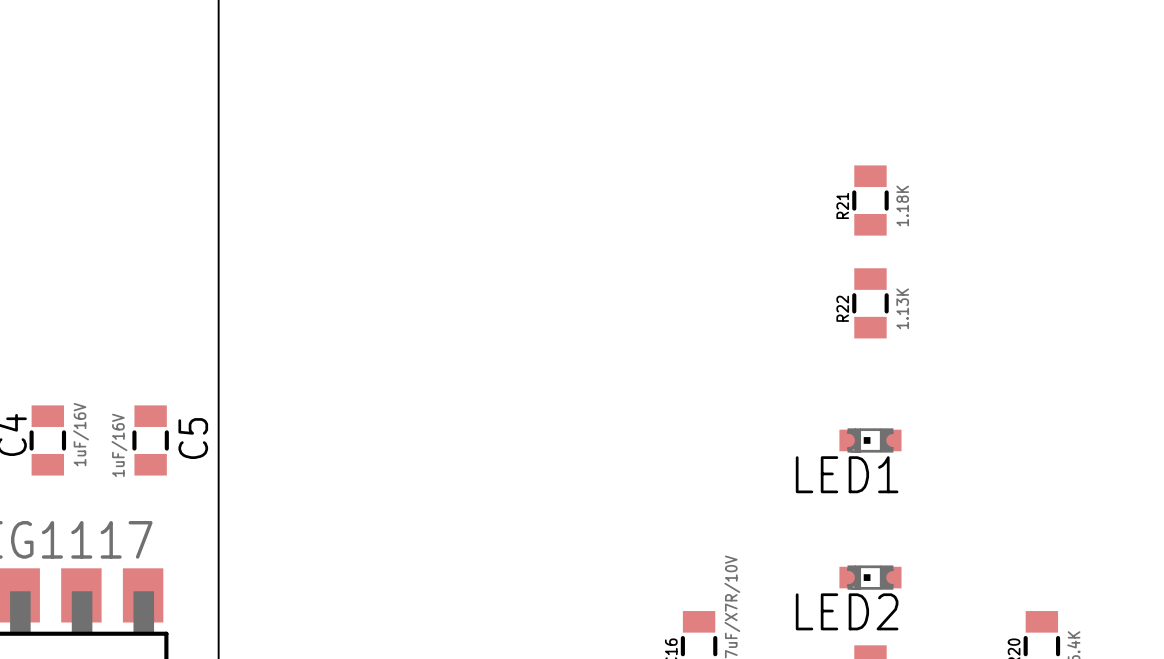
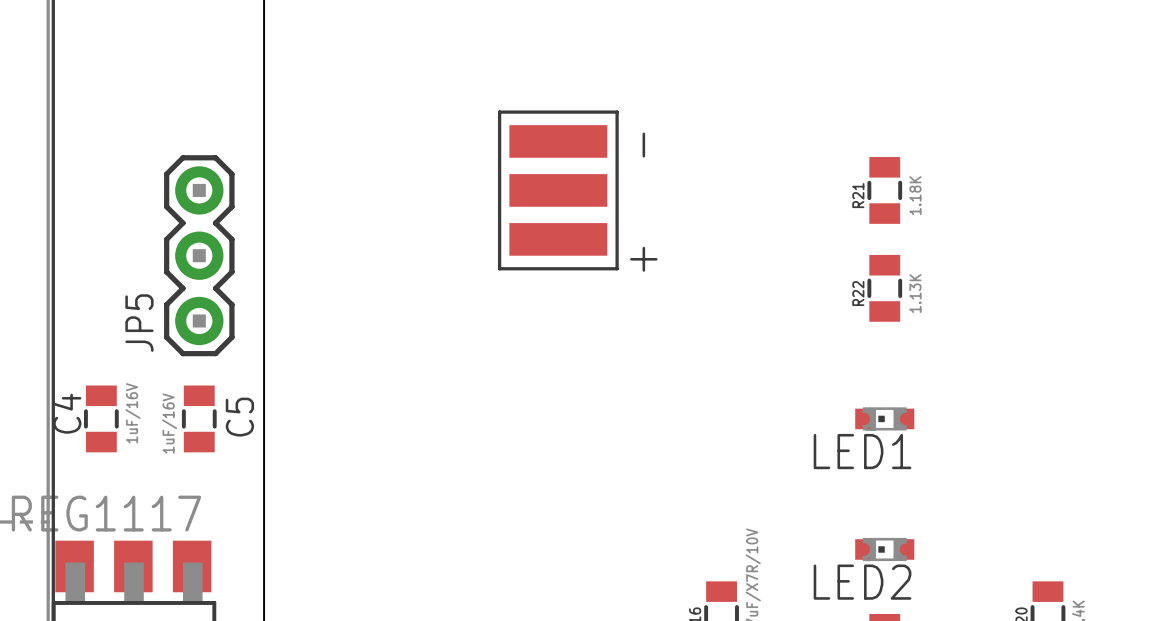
part: none -> (558, 190)
JP5: none -> (199, 255)

